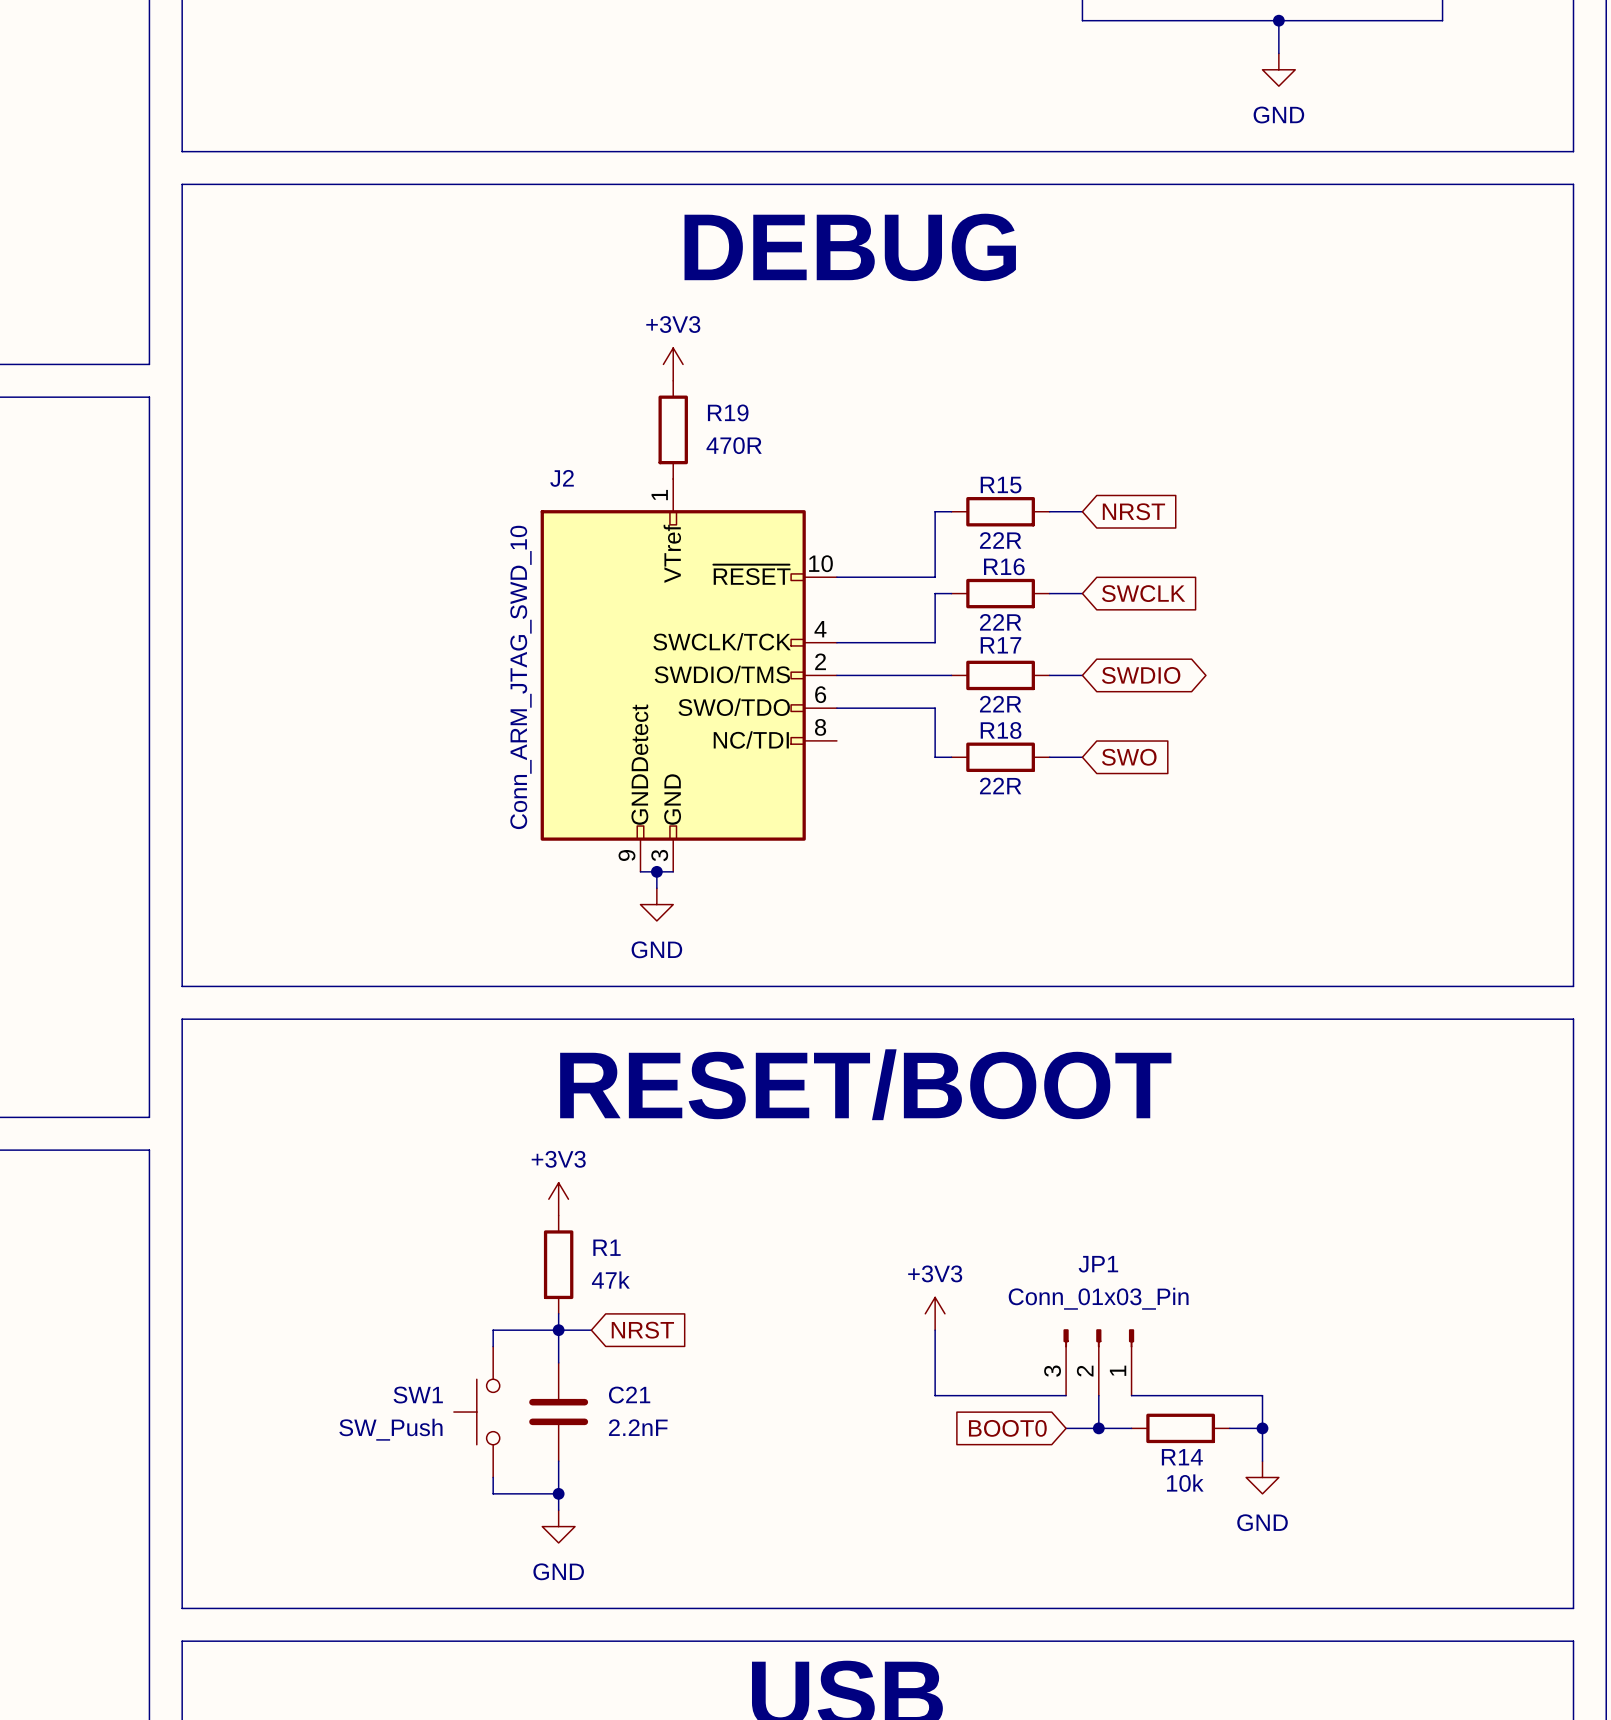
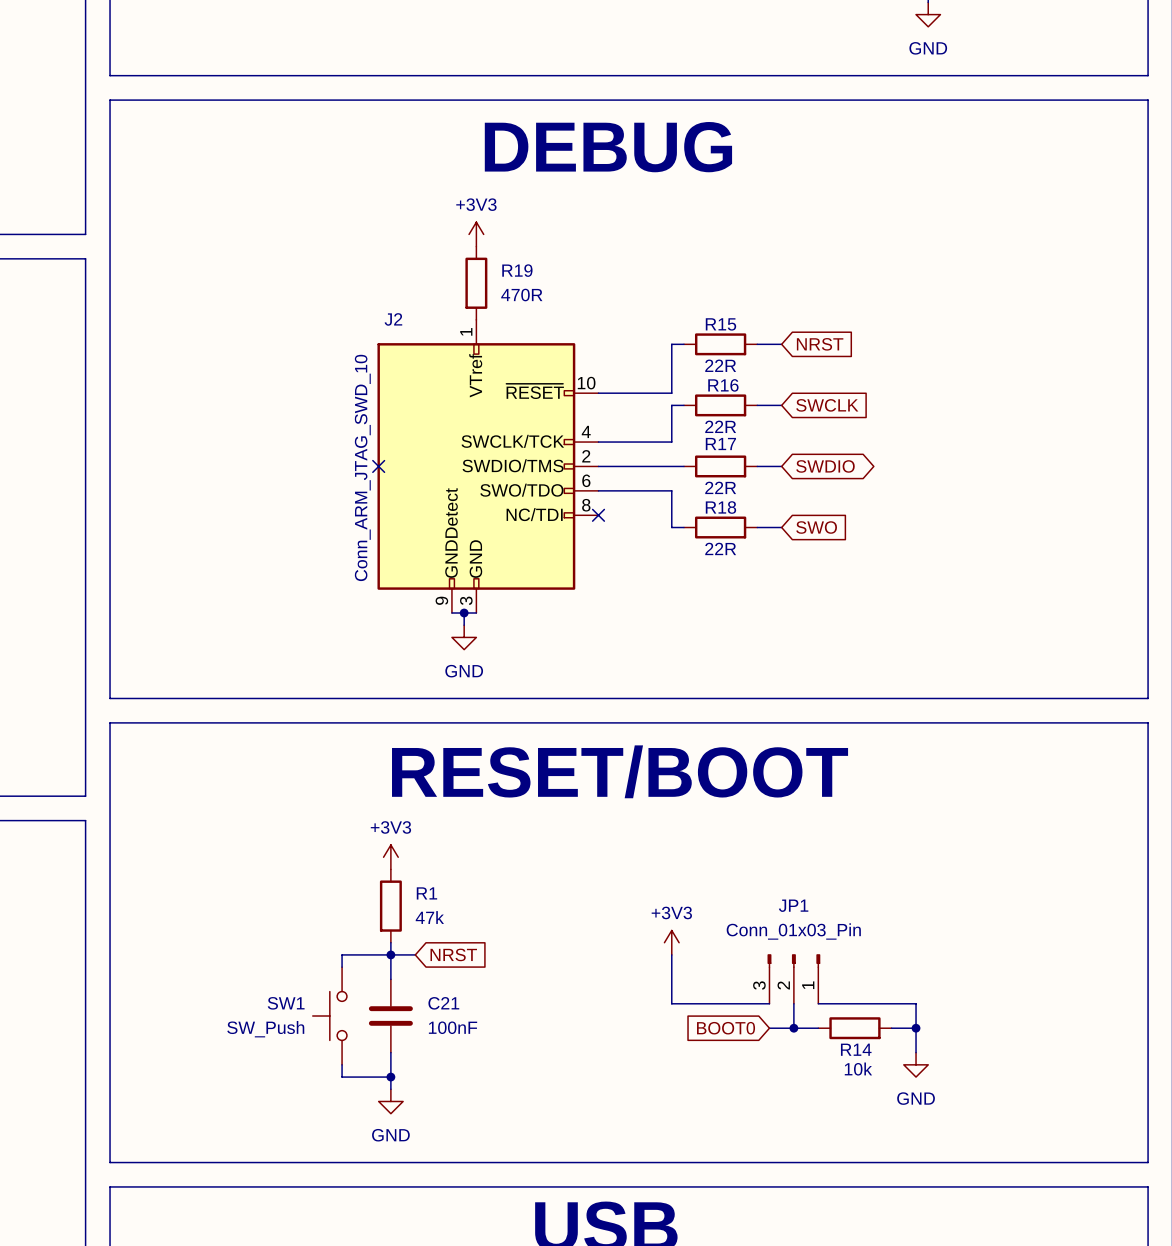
no-connect mark: none -> (378, 466)
no-connect mark: none -> (598, 515)
C21 value: 2.2nF (638, 1427) -> 100nF (453, 1027)

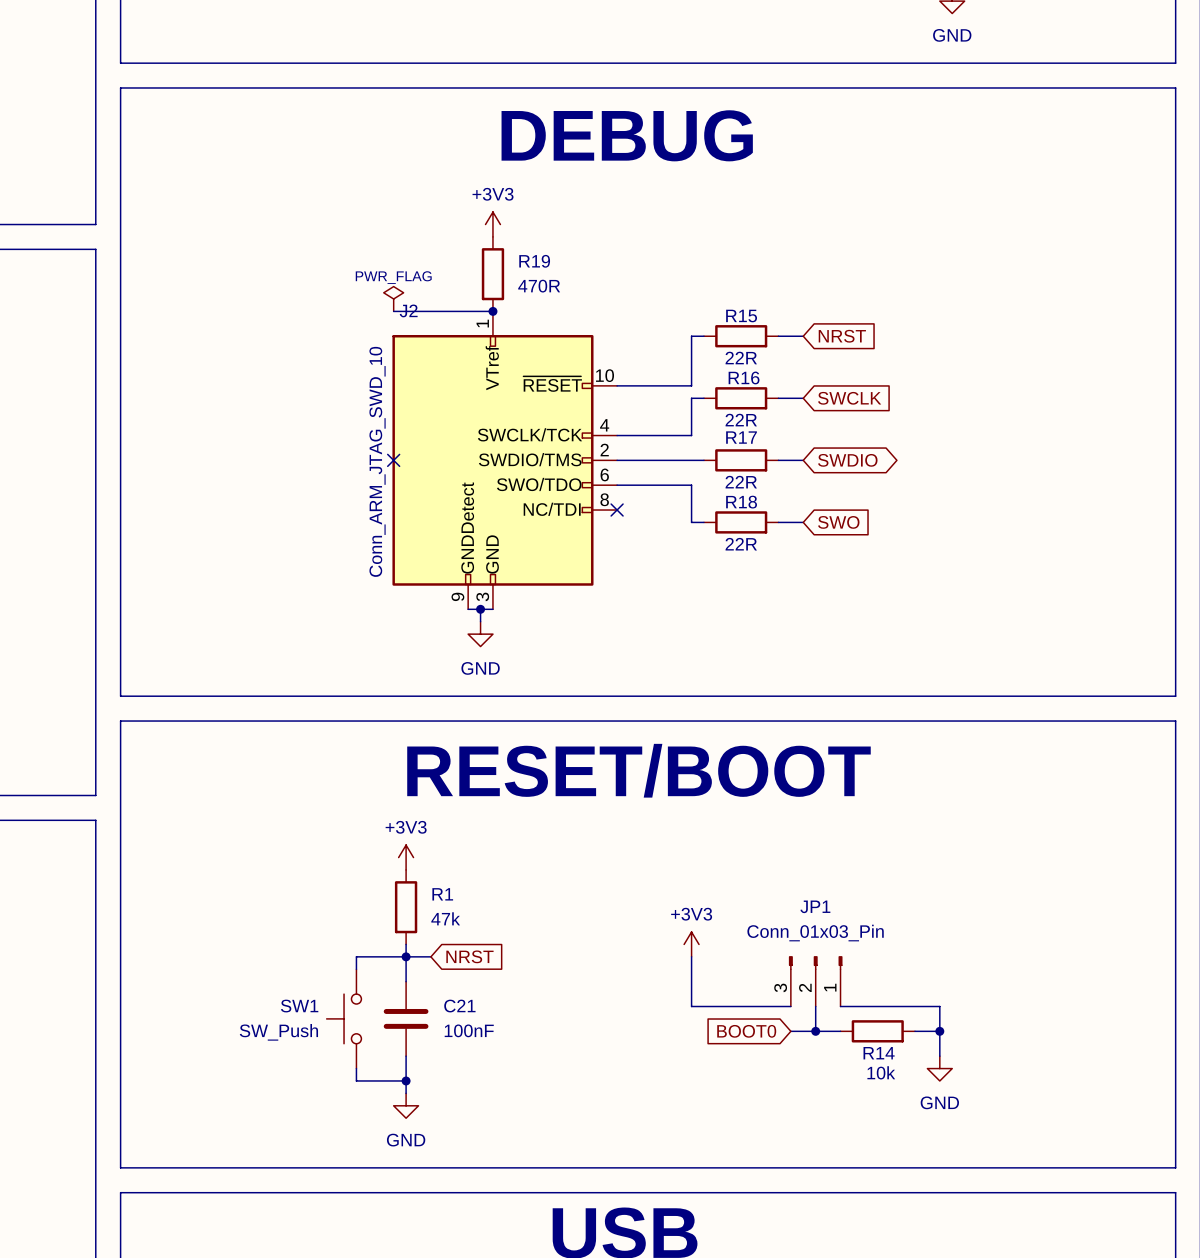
power symbol: none -> PWR_FLAG (393, 299)
wire: none -> (393, 311) (492, 311)
junction: none -> (492, 311)

